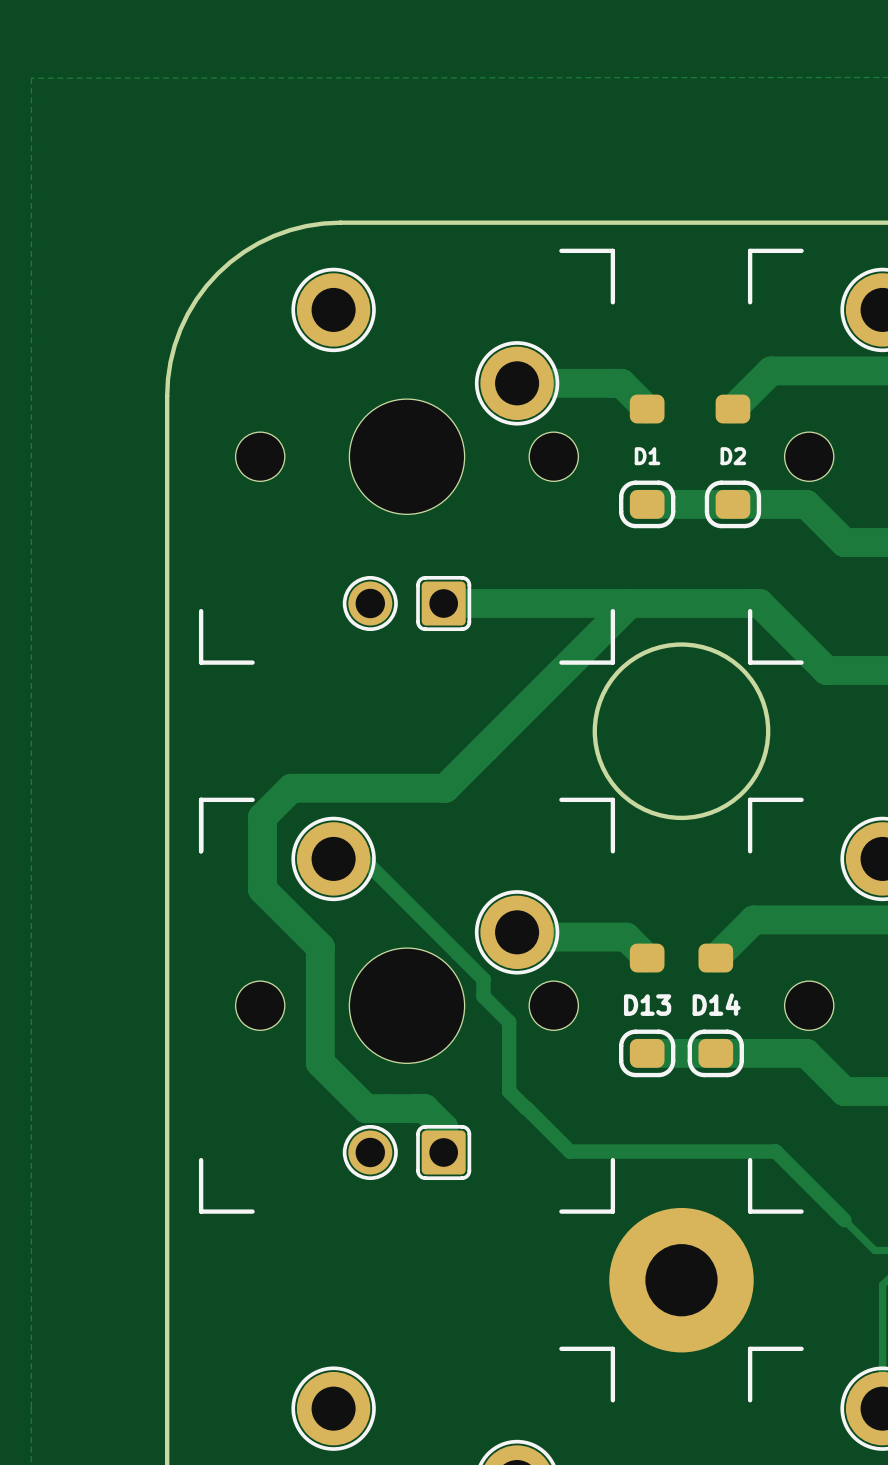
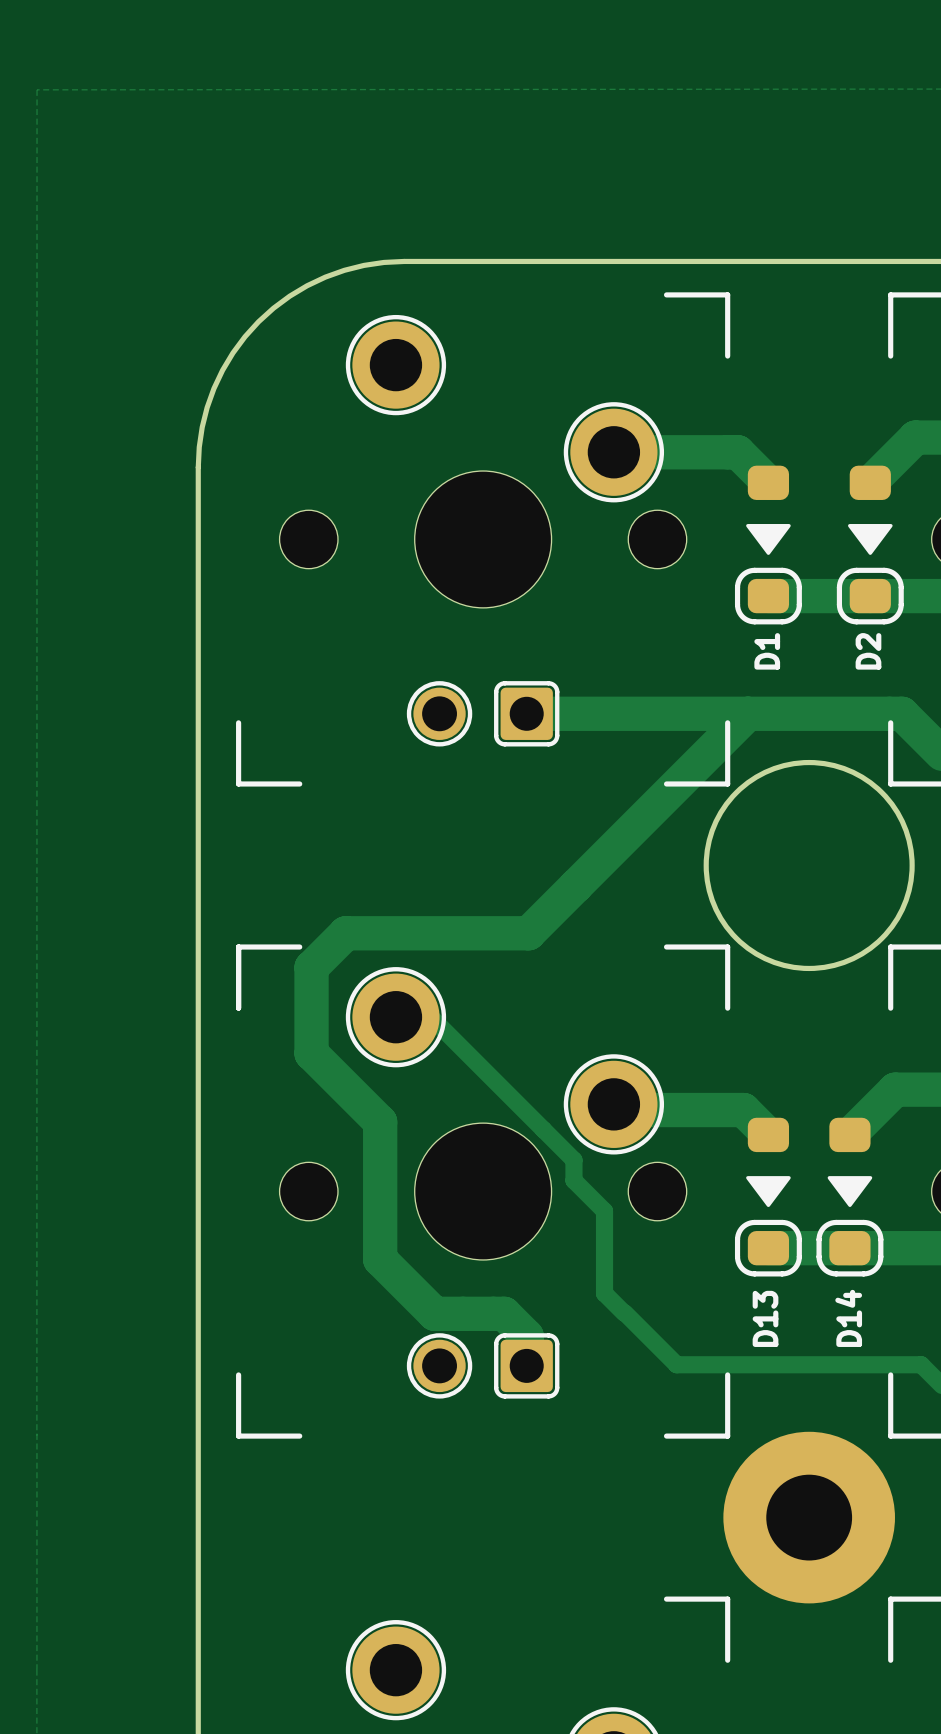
D1 footprint: [619, 394, 676, 529] -> [734, 465, 802, 625]
D2 footprint: [704, 394, 762, 529] -> [836, 465, 904, 625]
D1 name position: D1 (647, 456) -> D1 (767, 651)
D2 name position: D2 (733, 456) -> D2 (868, 651)
D13 footprint: [619, 943, 676, 1078] -> [734, 1117, 802, 1277]
D14 footprint: [687, 943, 744, 1078] -> [816, 1117, 884, 1277]
D14 name position: D14 (716, 1004) -> D14 (848, 1318)
D13 name position: D13 (647, 1005) -> D13 (765, 1318)

